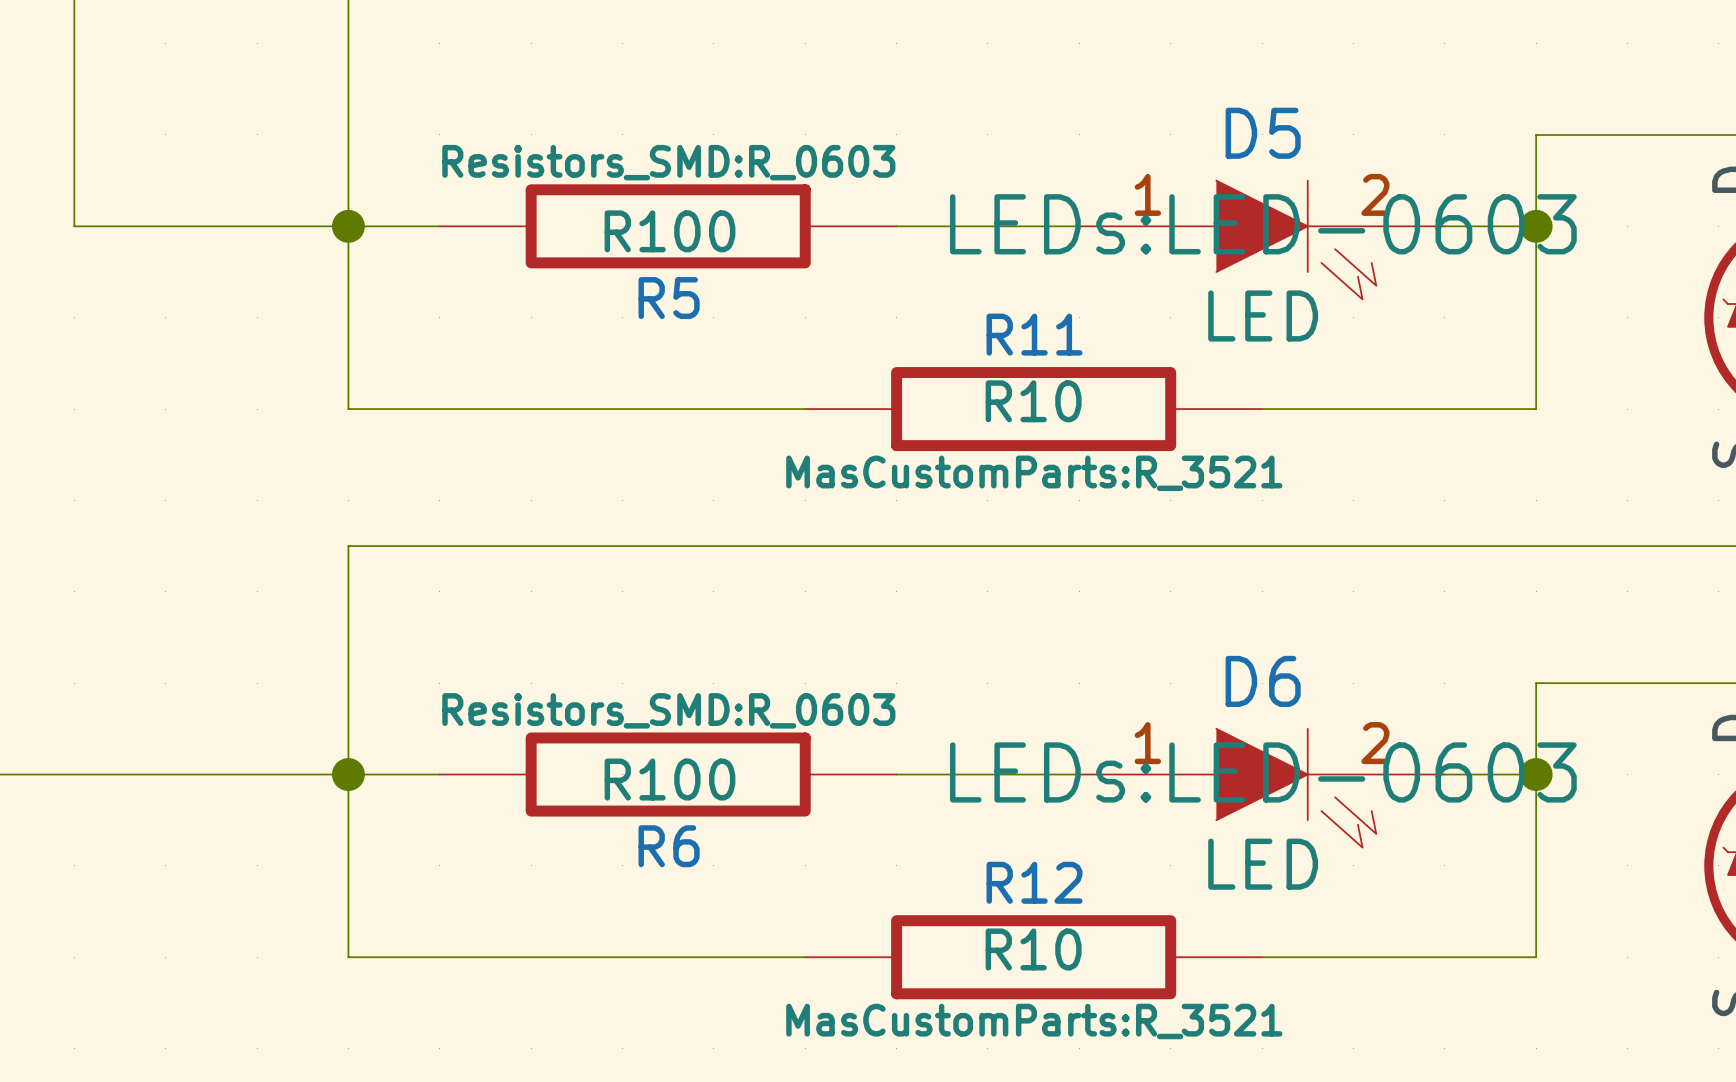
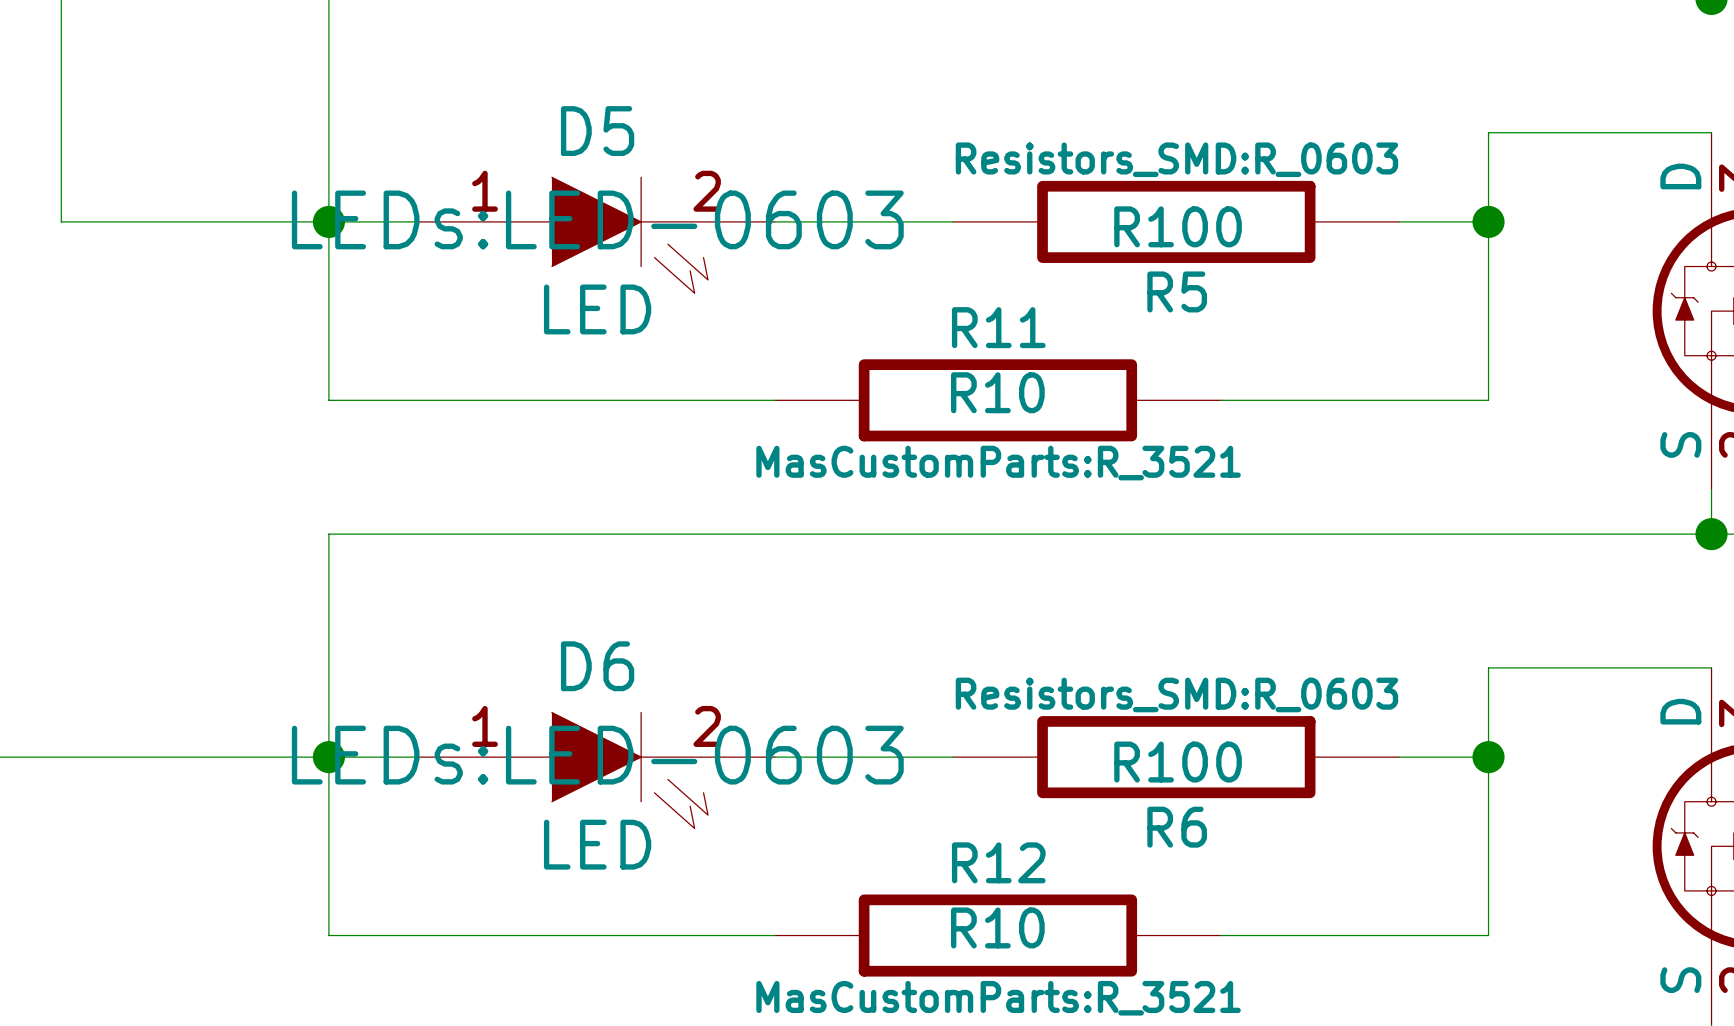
R5 position: (668, 226) -> (1176, 221)
D5 position: (1262, 240) -> (596, 235)
R6 position: (668, 774) -> (1176, 757)
D6 position: (1262, 788) -> (596, 770)

